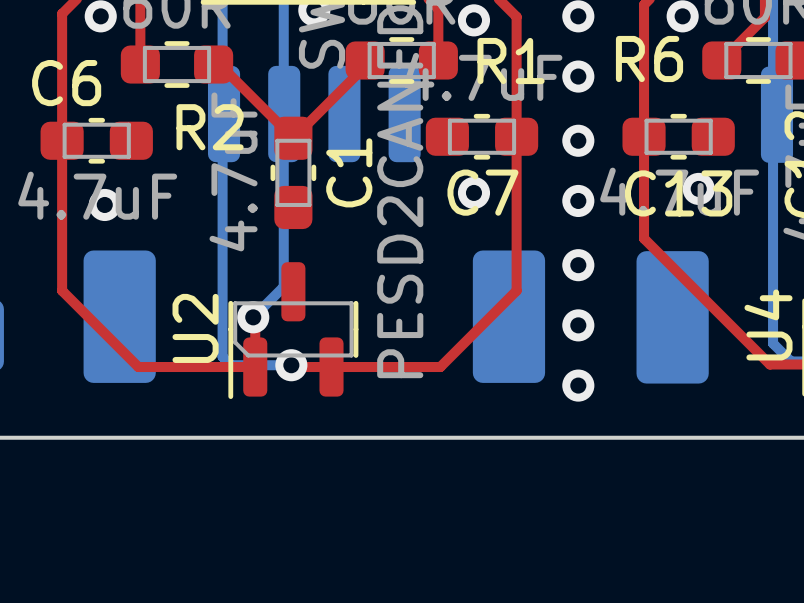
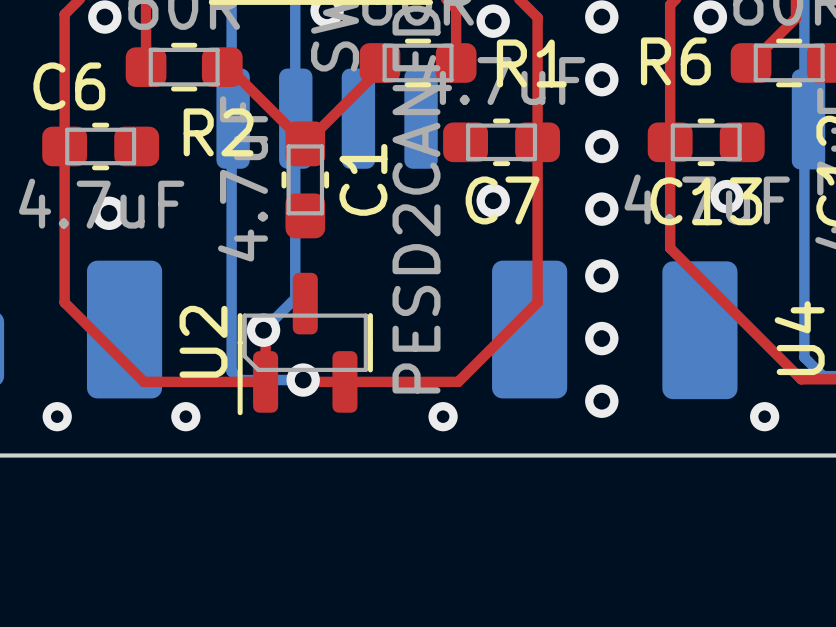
via: none -> (57, 416)
via: none -> (185, 416)
via: none -> (443, 416)
via: none -> (764, 416)

